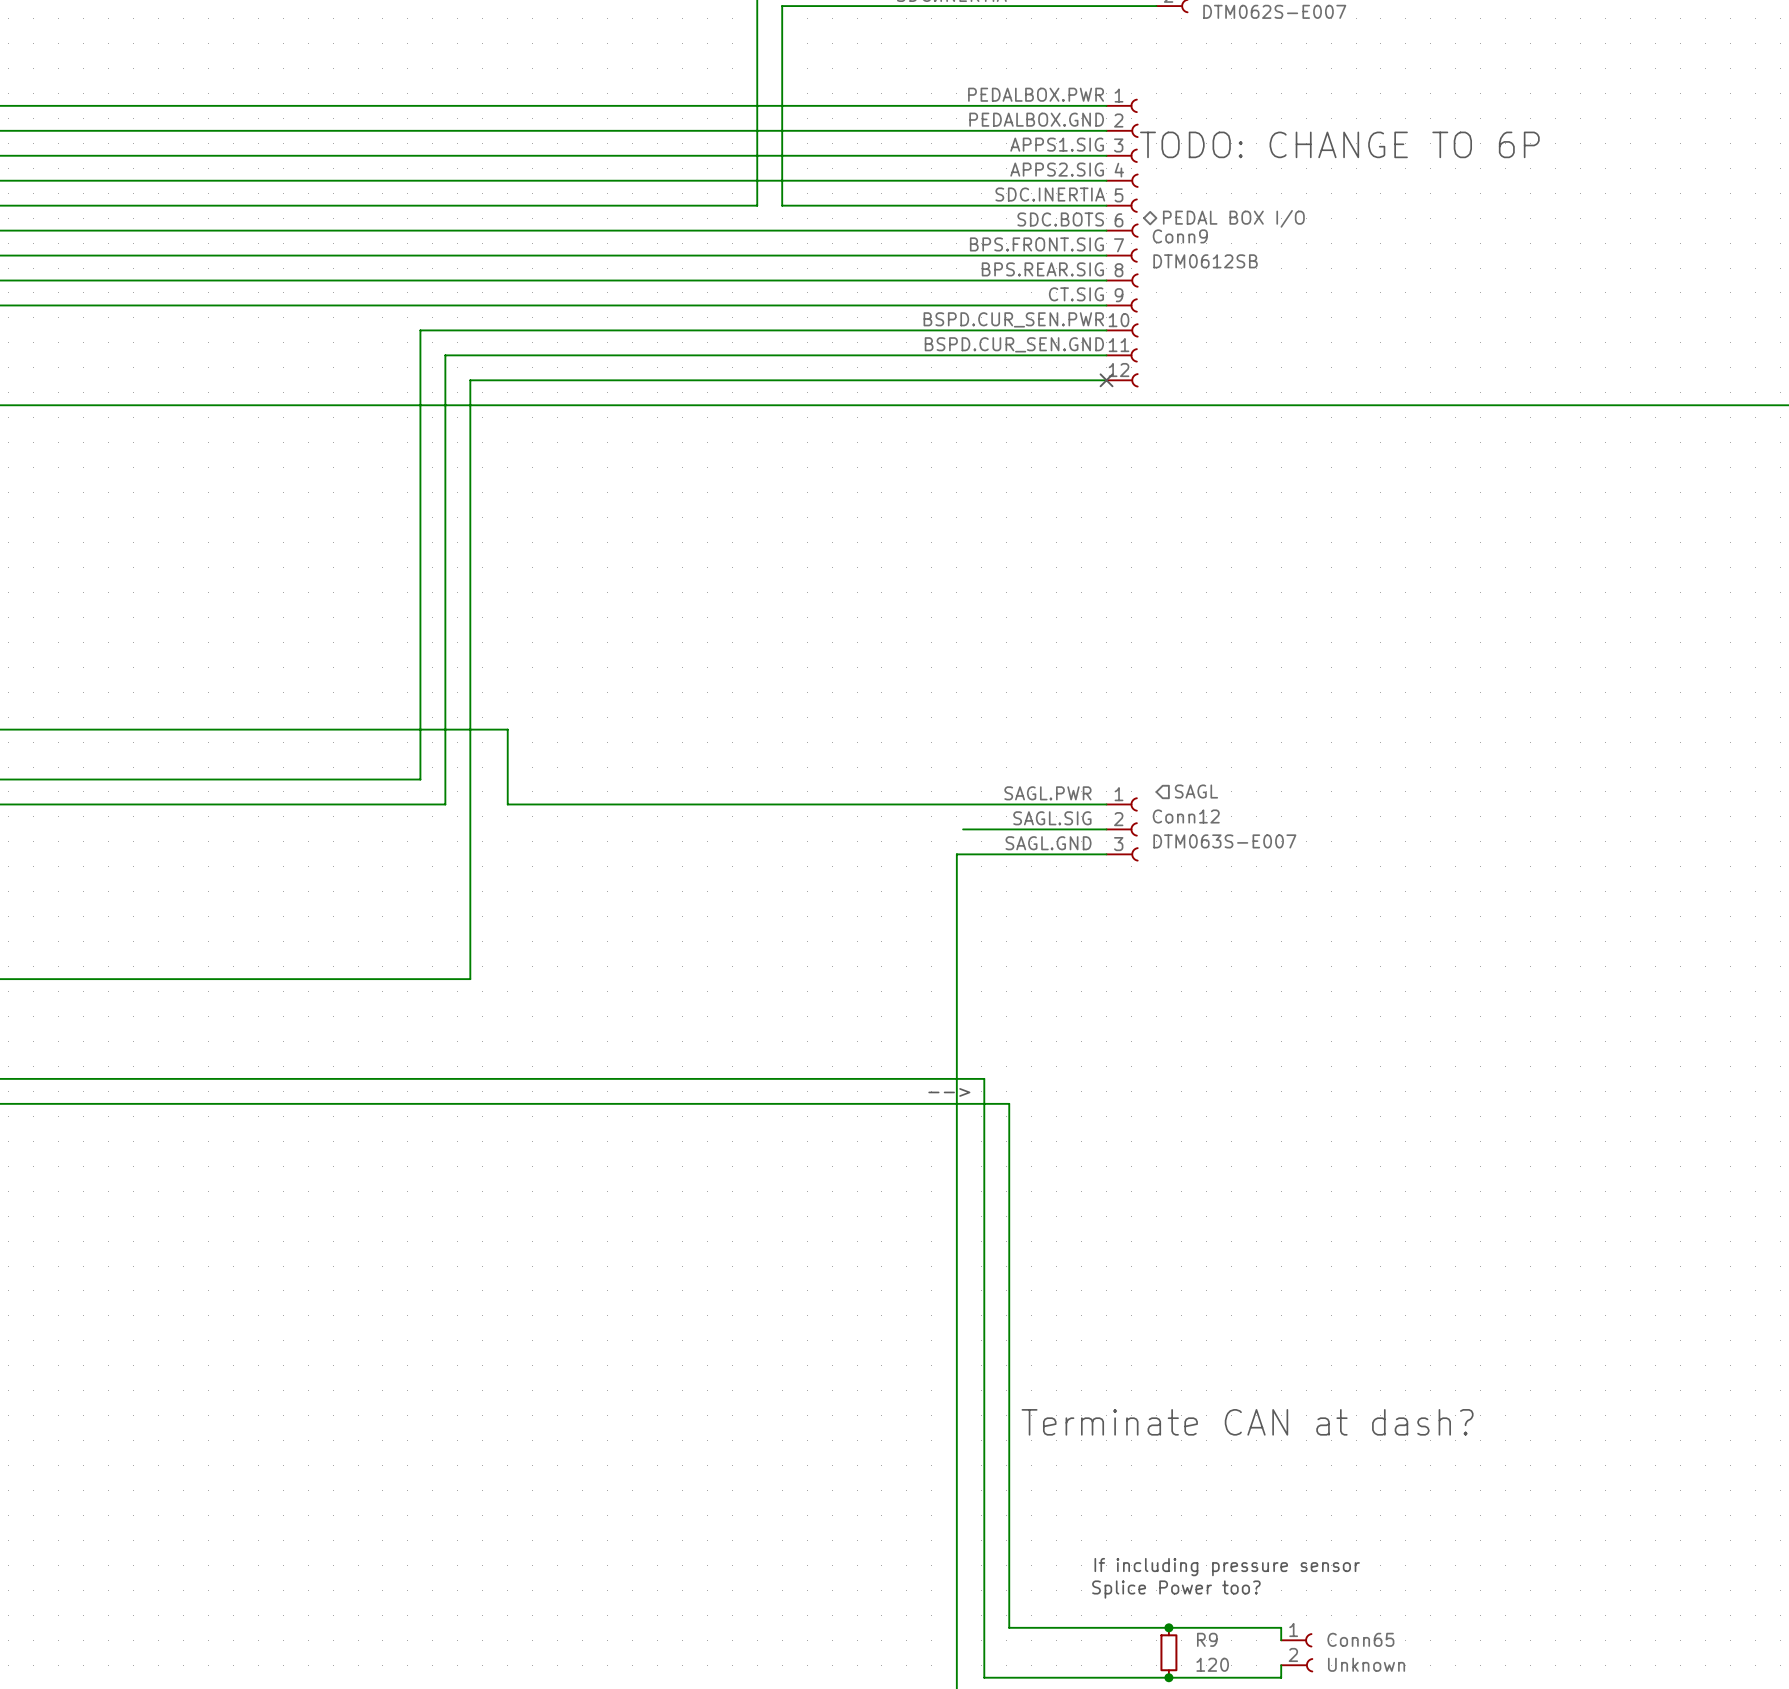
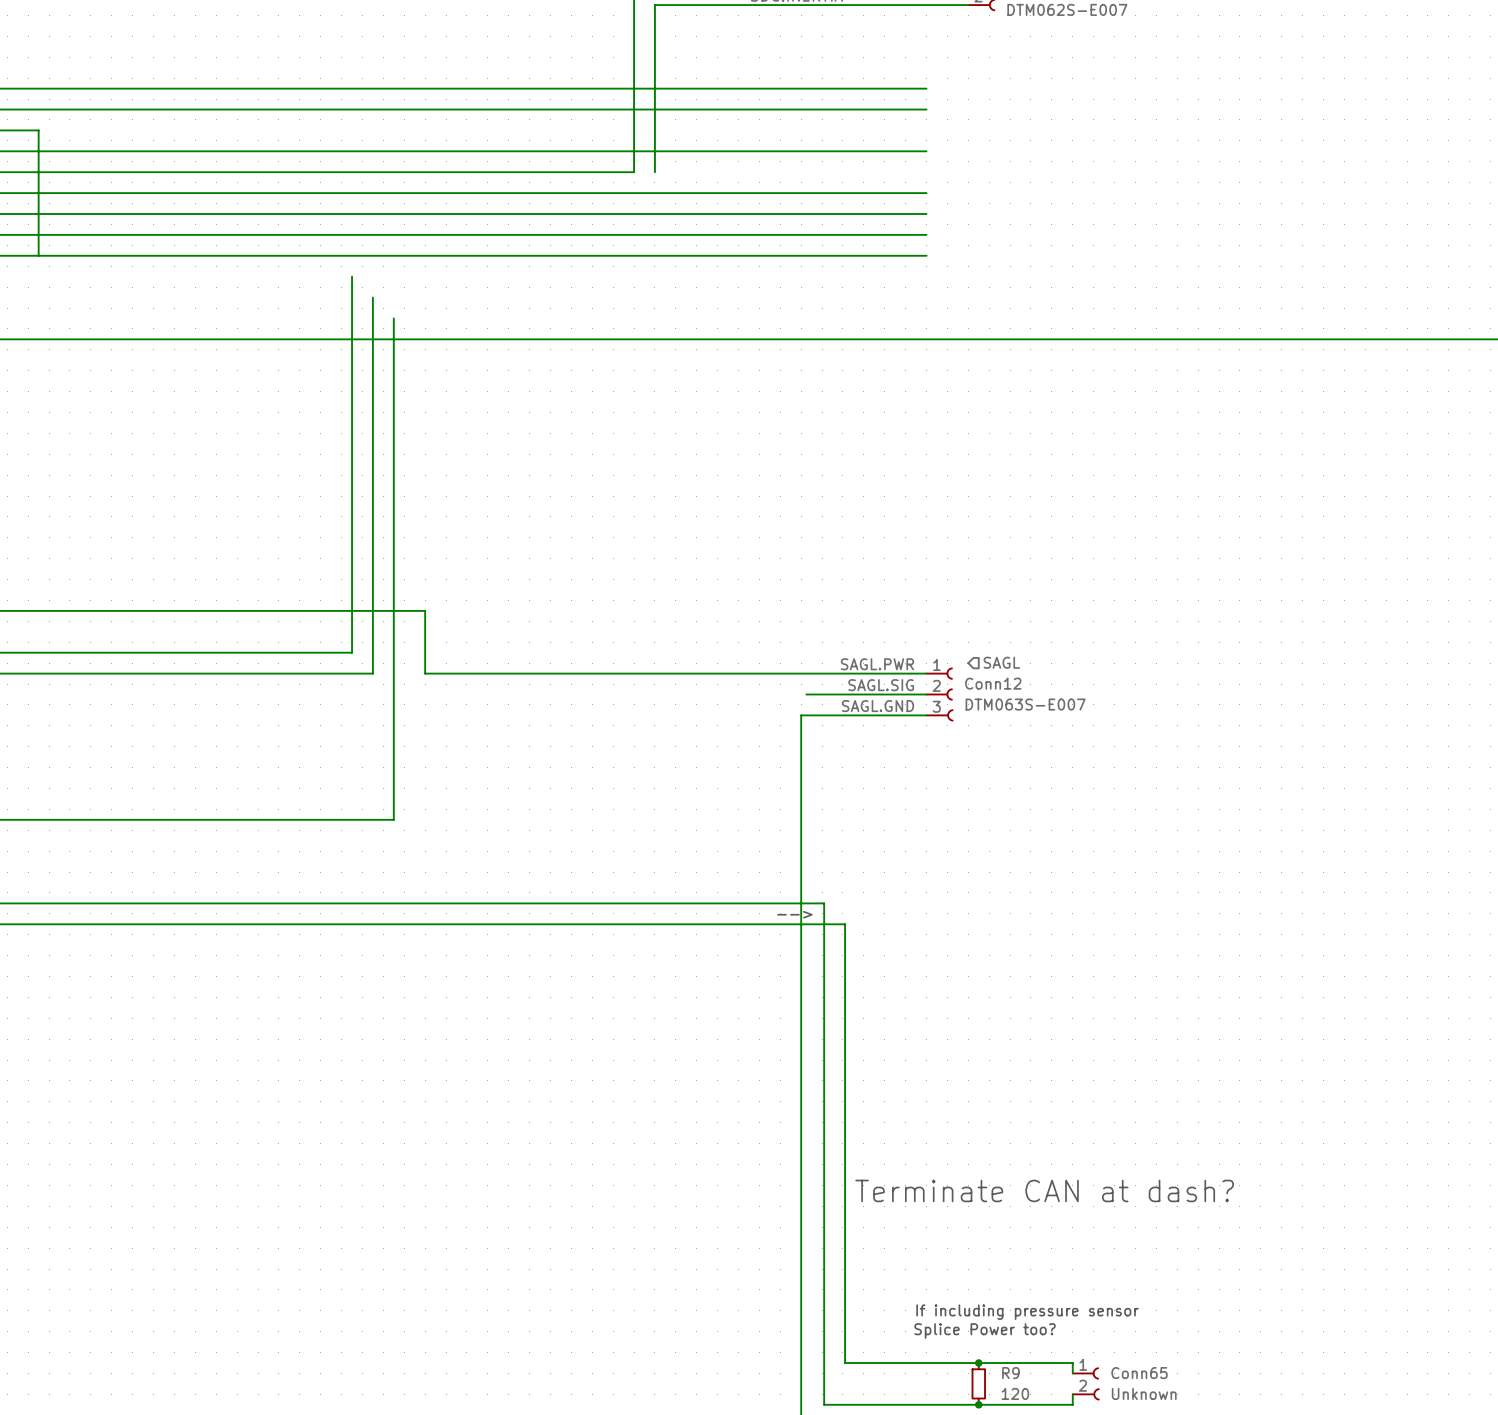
label: PEDALBOX.PWR (1036, 94) -> none
label: PEDALBOX.GND (1036, 119) -> none
label: APPS1.SIG (1057, 144) -> none
text: TODO: CHANGE TO 6P (1339, 144) -> none
wire: (46, 155) (1106, 155) -> (38, 130) (38, 255)
label: APPS2.SIG (1057, 169) -> none
label: SDC.INERTIA (1050, 194) -> none
wire: (782, 205) (1106, 205) -> none
hierarchical label: PEDAL BOX I/O (1233, 218) -> none
label: SDC.BOTS (1060, 219) -> none
Conn9: (1122, 243) -> none
label: BPS.FRONT.SIG (1036, 244) -> none
label: BPS.REAR.SIG (1042, 269) -> none
label: CT.SIG (1076, 294) -> none
label: BSPD.CUR_SEN.PWR (1013, 319) -> none
wire: (420, 330) (1106, 330) -> none
label: BSPD.CUR_SEN.GND (1014, 344) -> none
wire: (445, 355) (1106, 355) -> none
wire: (470, 380) (1106, 380) -> none
no-connect mark: (1106, 380) -> none

